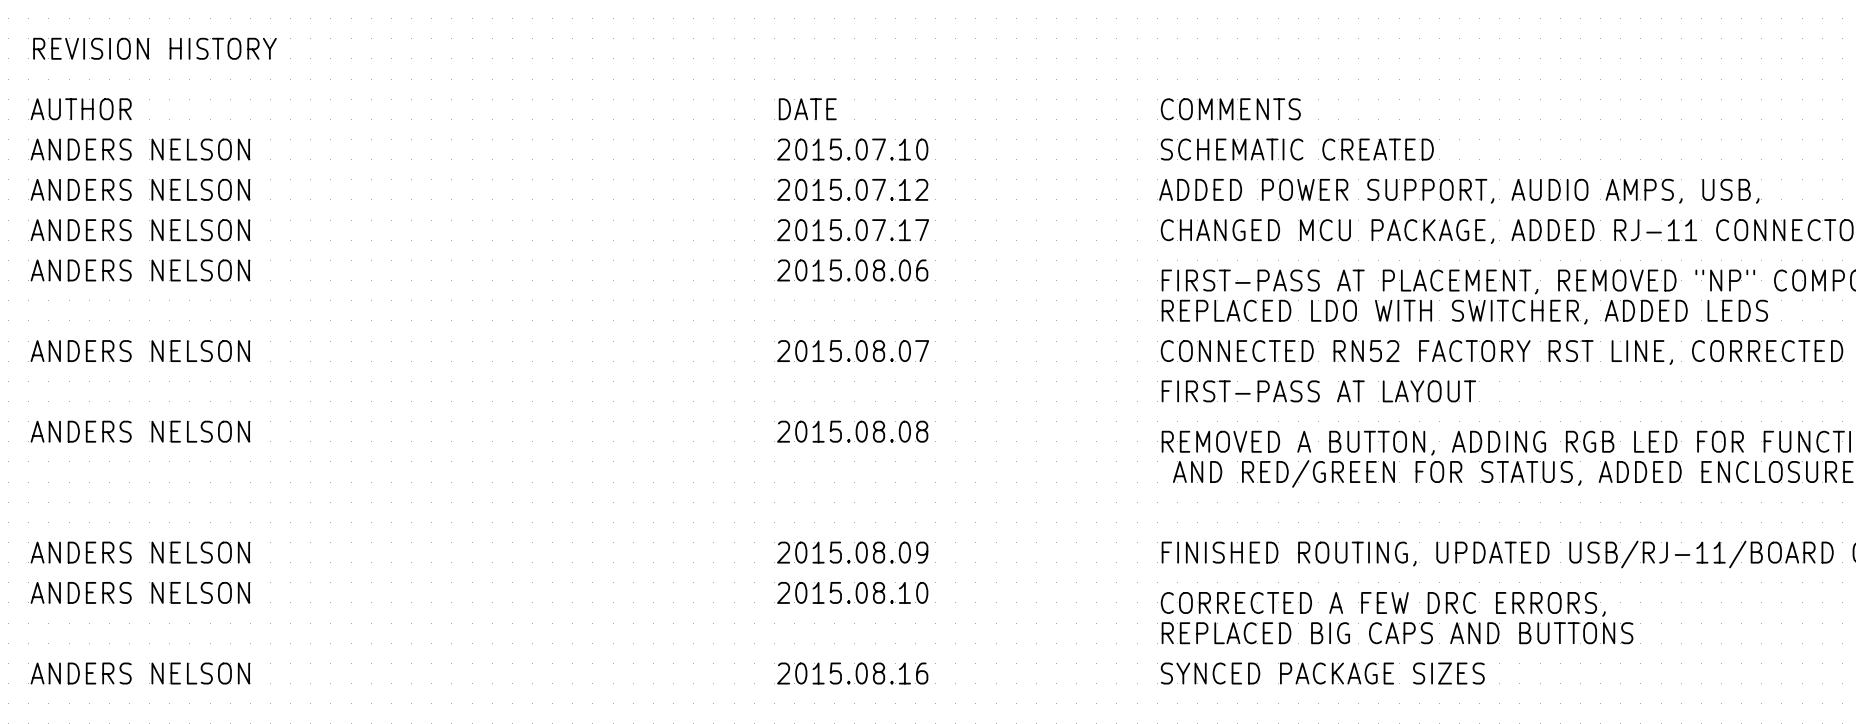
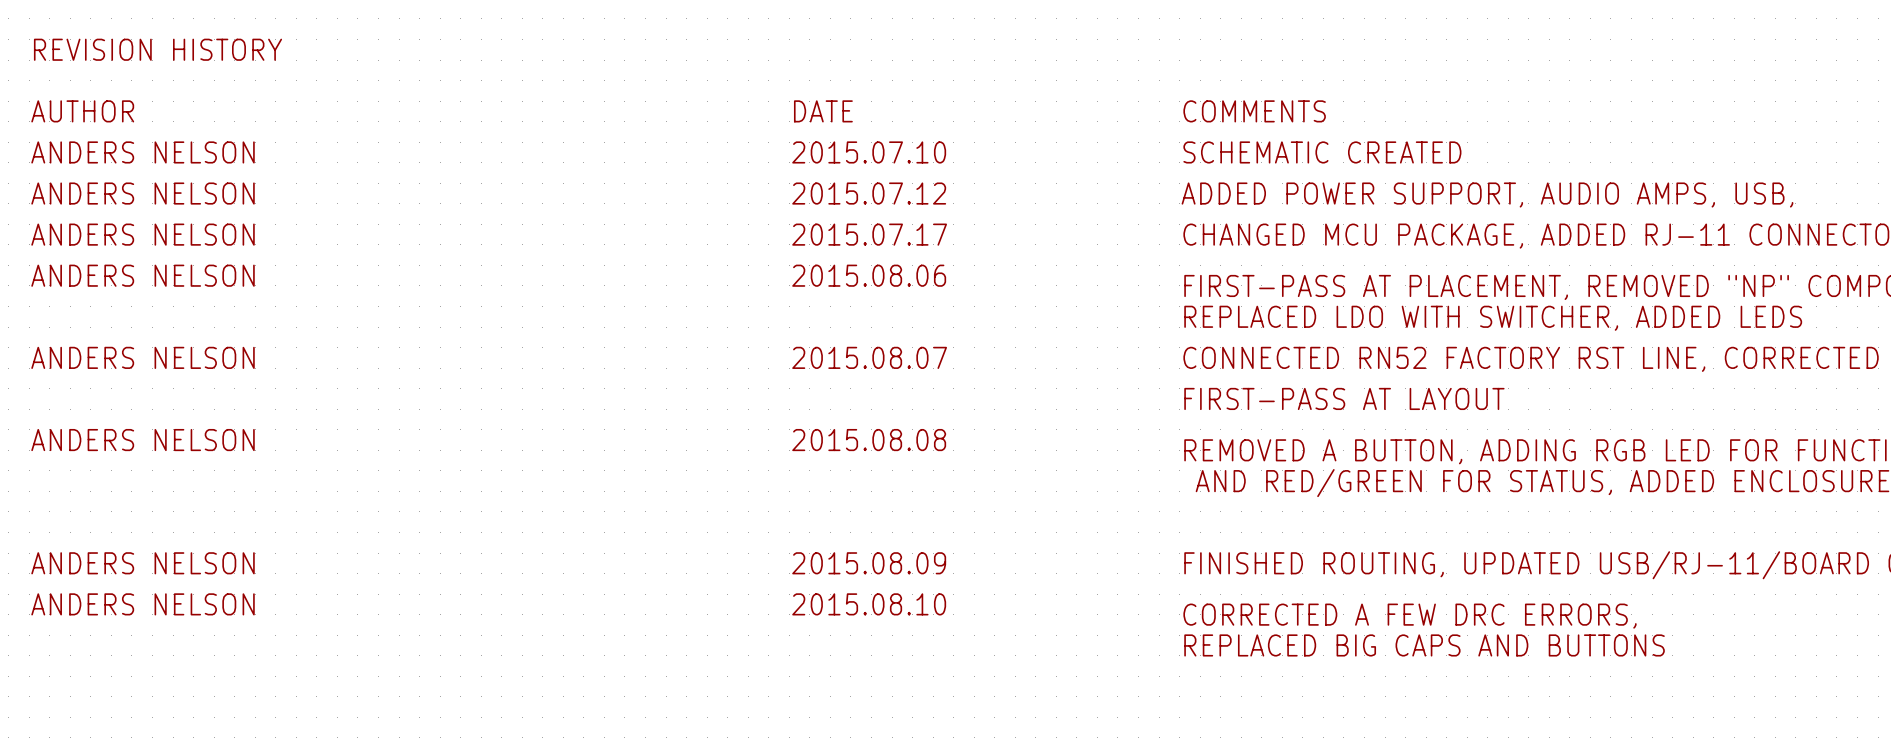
text: ANDERS NELSON (140, 673) -> none
text: 2015.08.16 (852, 673) -> none
text: SYNCED PACKAGE SIZES (1322, 673) -> none

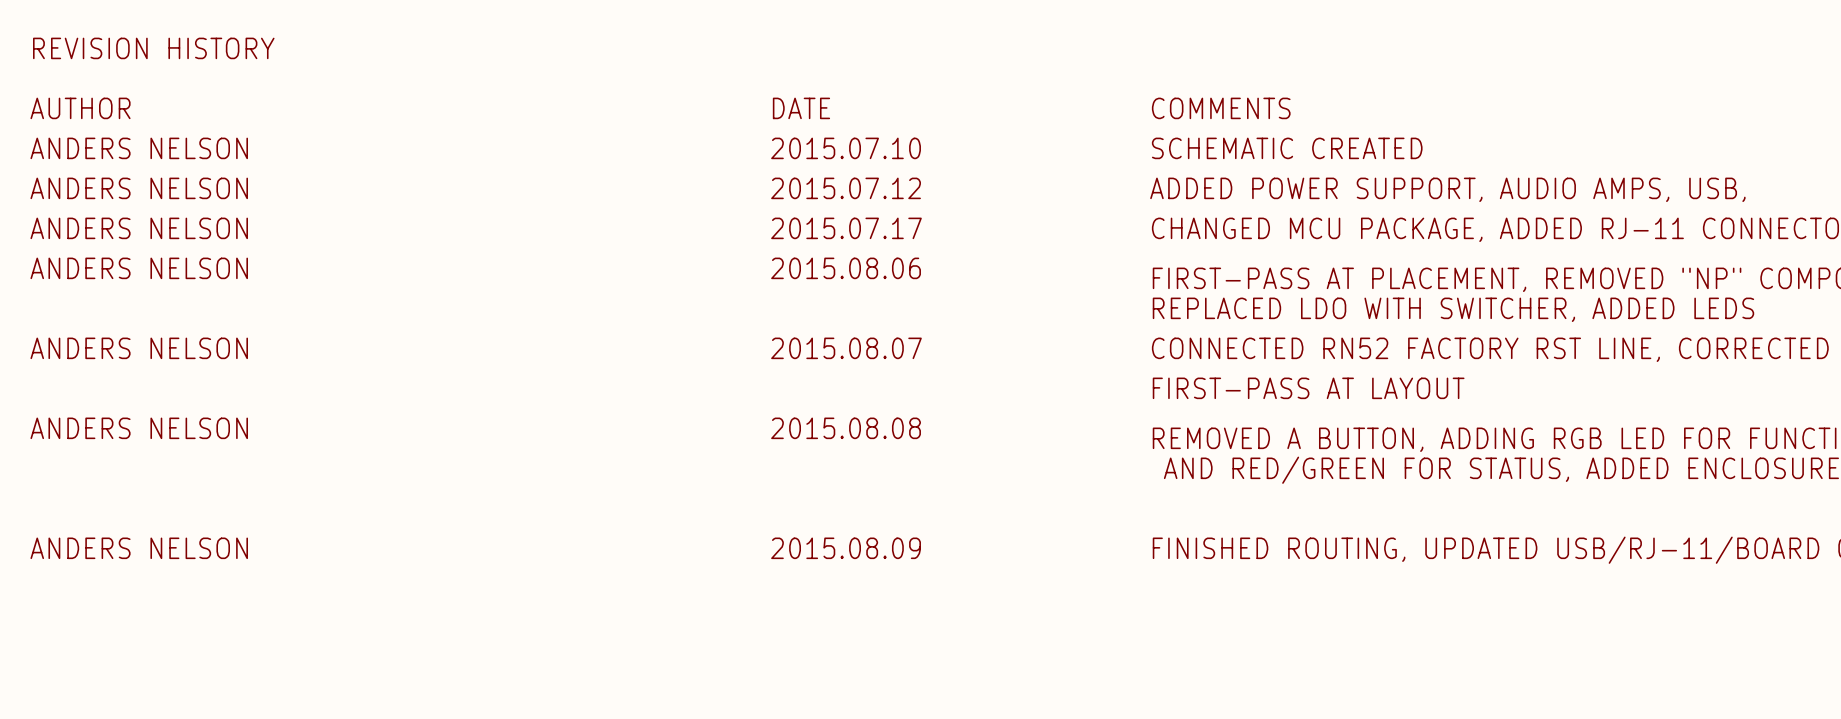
text: ANDERS NELSON (143, 604) -> none
text: 2015.08.10 (869, 604) -> none
text: CORRECTED A FEW DRC ERRORS, (1410, 616) -> none
text: REPLACED BIG CAPS AND BUTTONS (1424, 645) -> none

